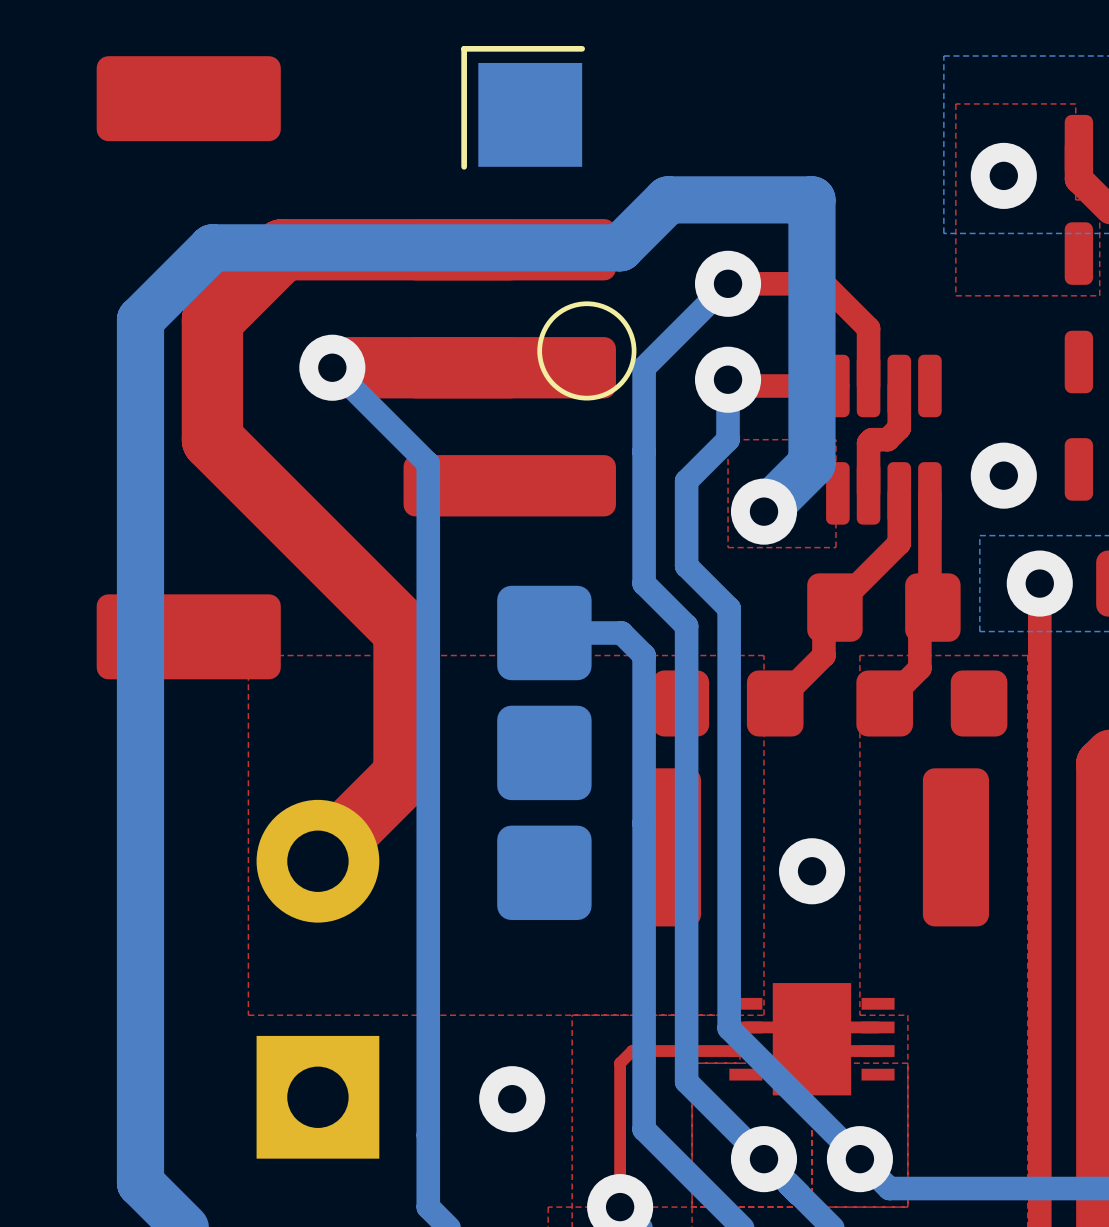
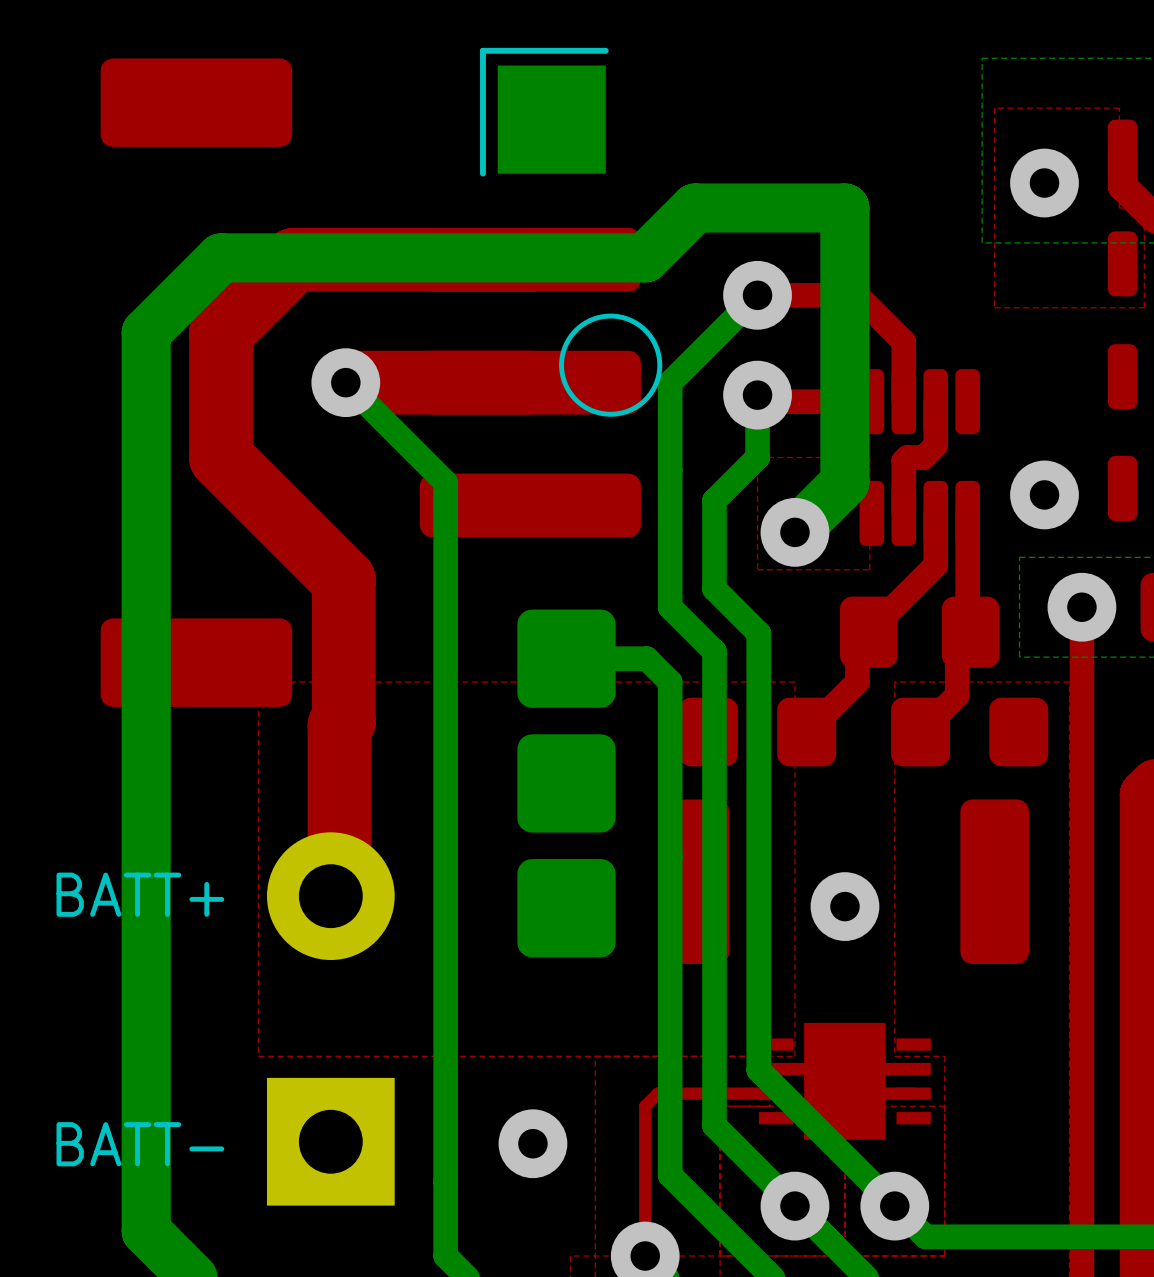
top track: (330, 557) (404, 631) (404, 775) (326, 852) -> (343, 580) (343, 721) (339, 725) (339, 887)
text: none -> BATT+ (140, 894)
text: none -> BATT- (140, 1144)

